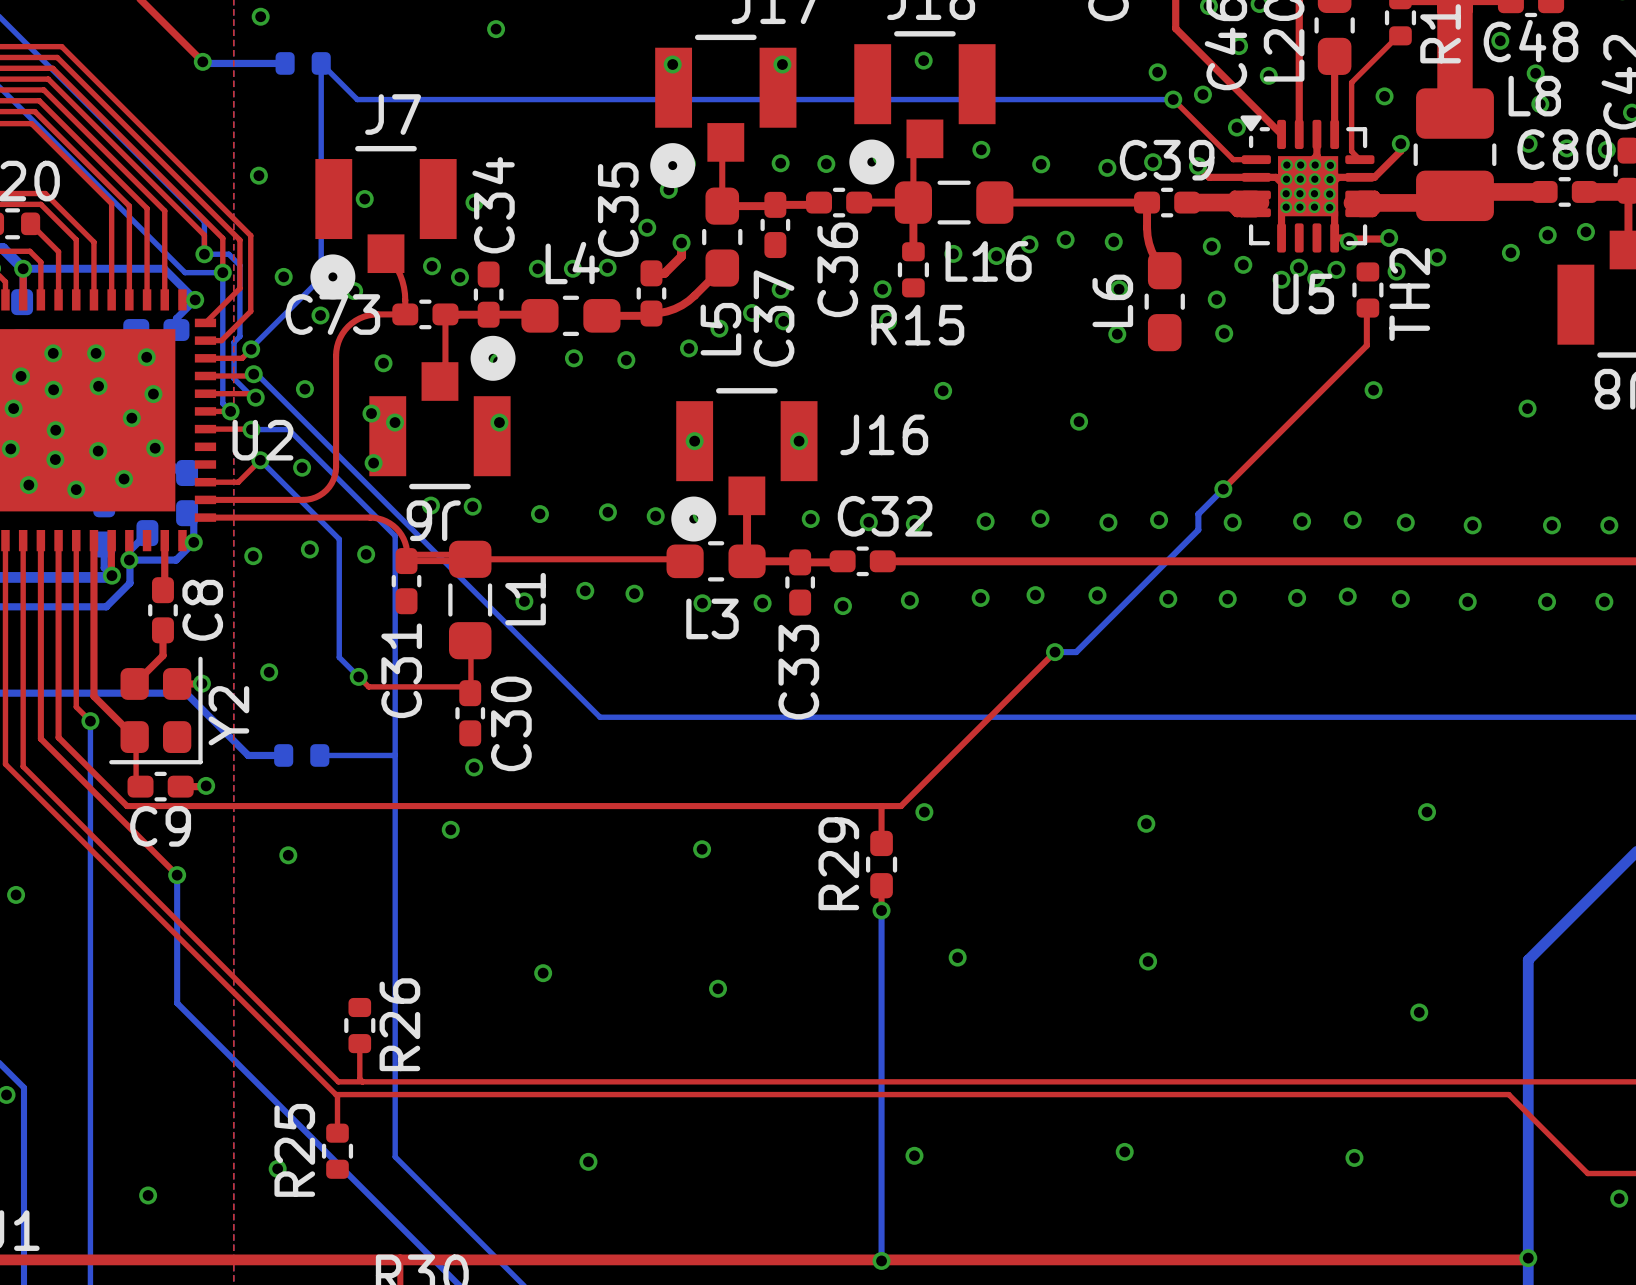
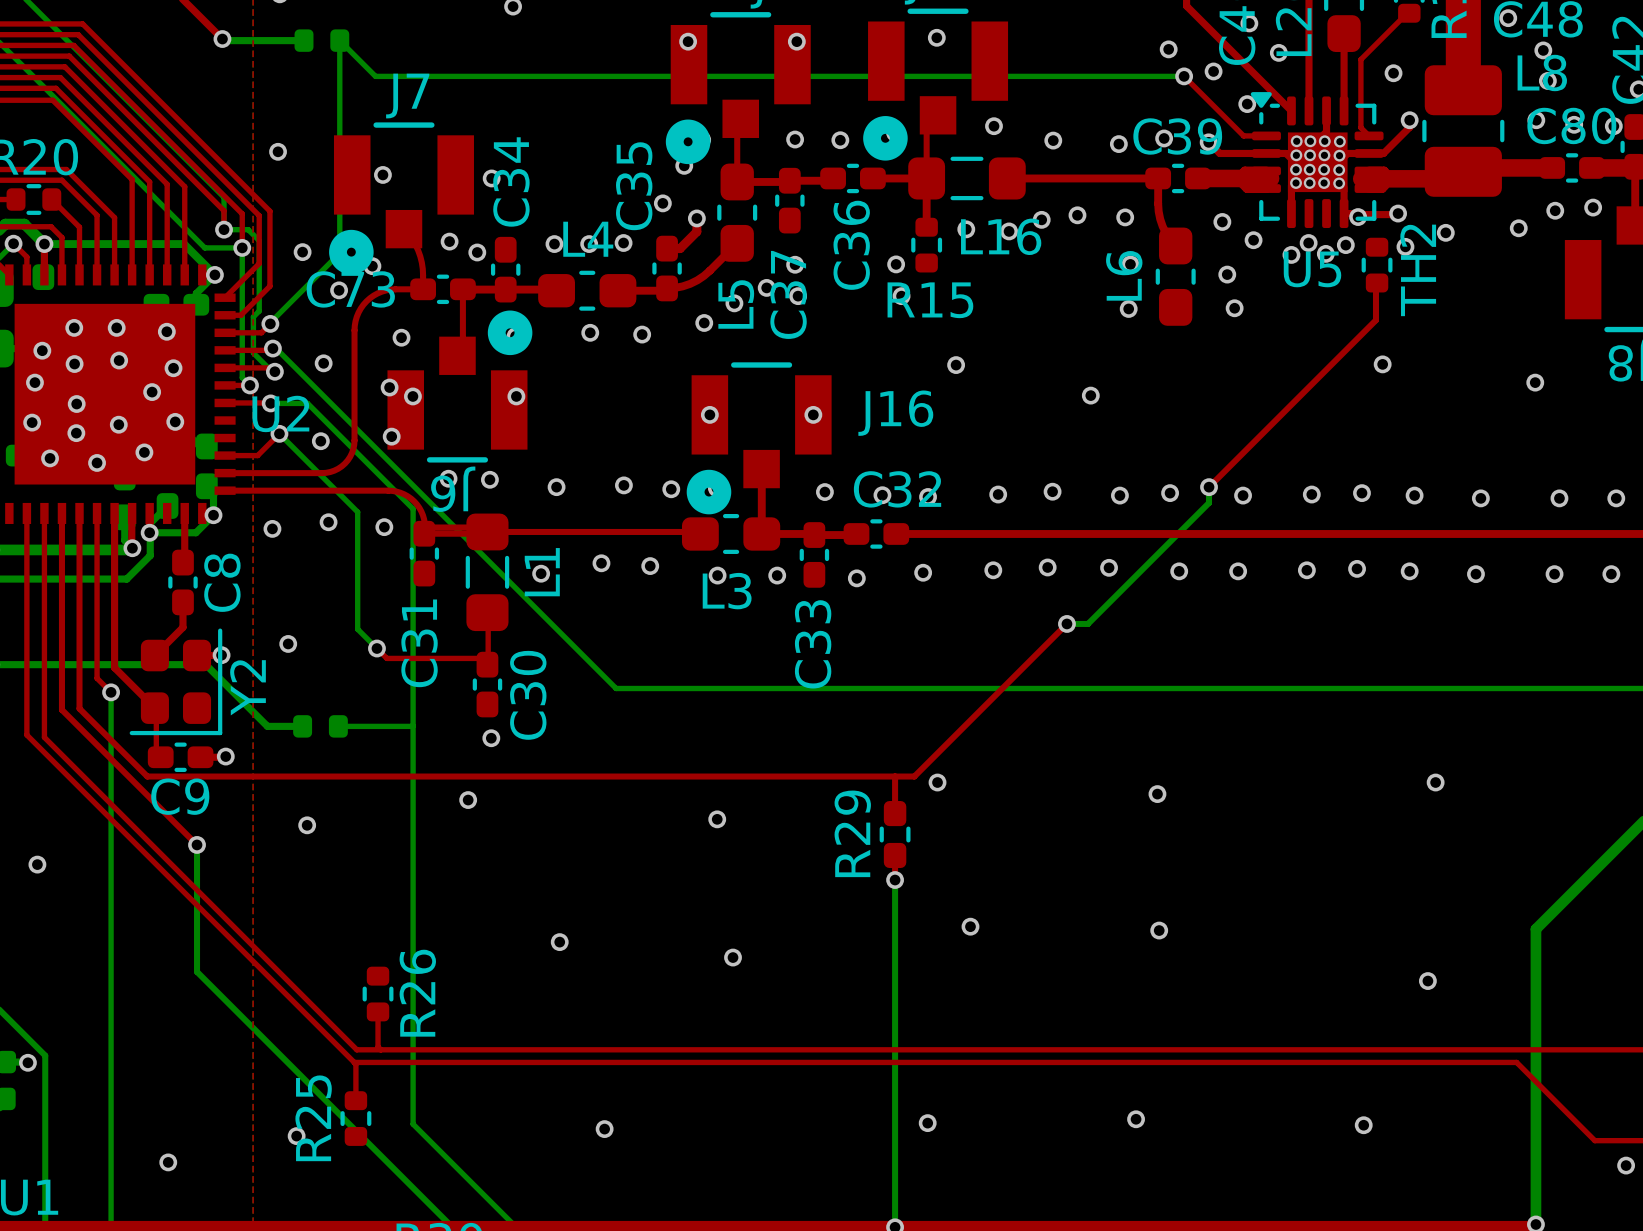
top track: none -> (1233, 462) (1209, 487)
bottom track: (1223, 489) (1198, 514) -> none
via position: (1223, 489) -> (1209, 487)

